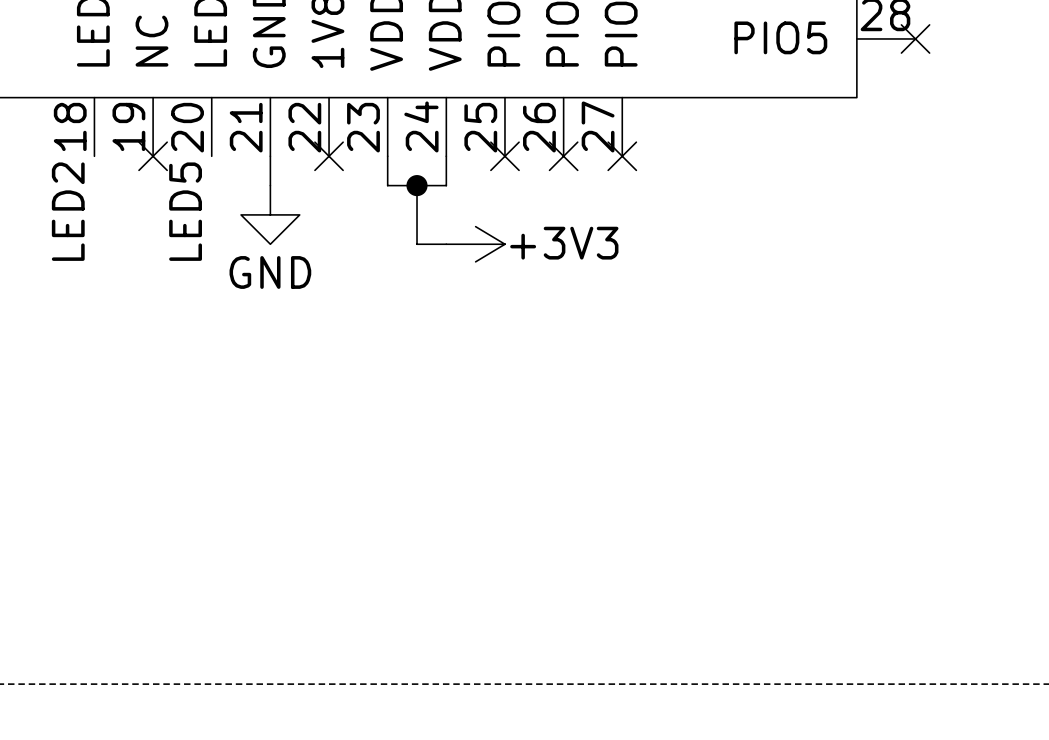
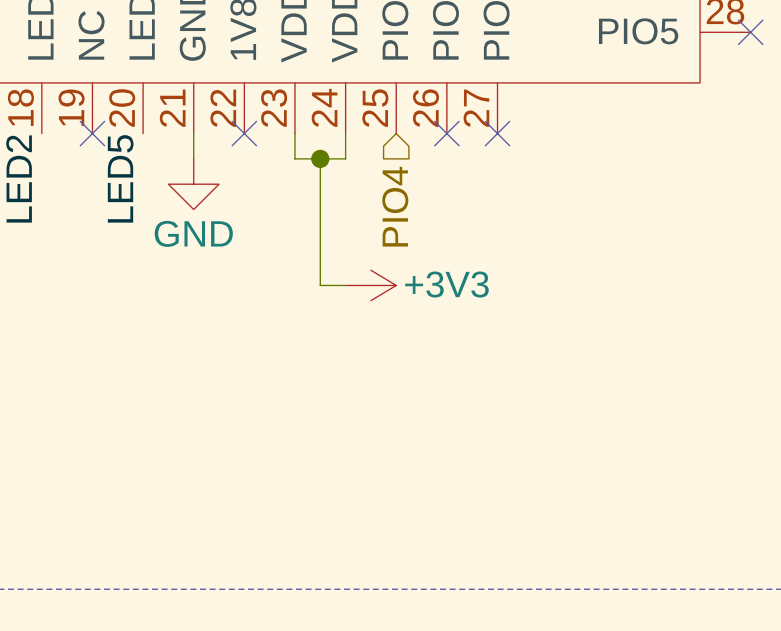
no-connect mark: (504, 156) -> none
wire: (417, 244) (446, 244) -> (320, 209) (320, 285) (345, 285)
power symbol position: +3V3 (475, 244) -> +3V3 (370, 285)
hierarchical label: none -> PIO4 (395, 206)

